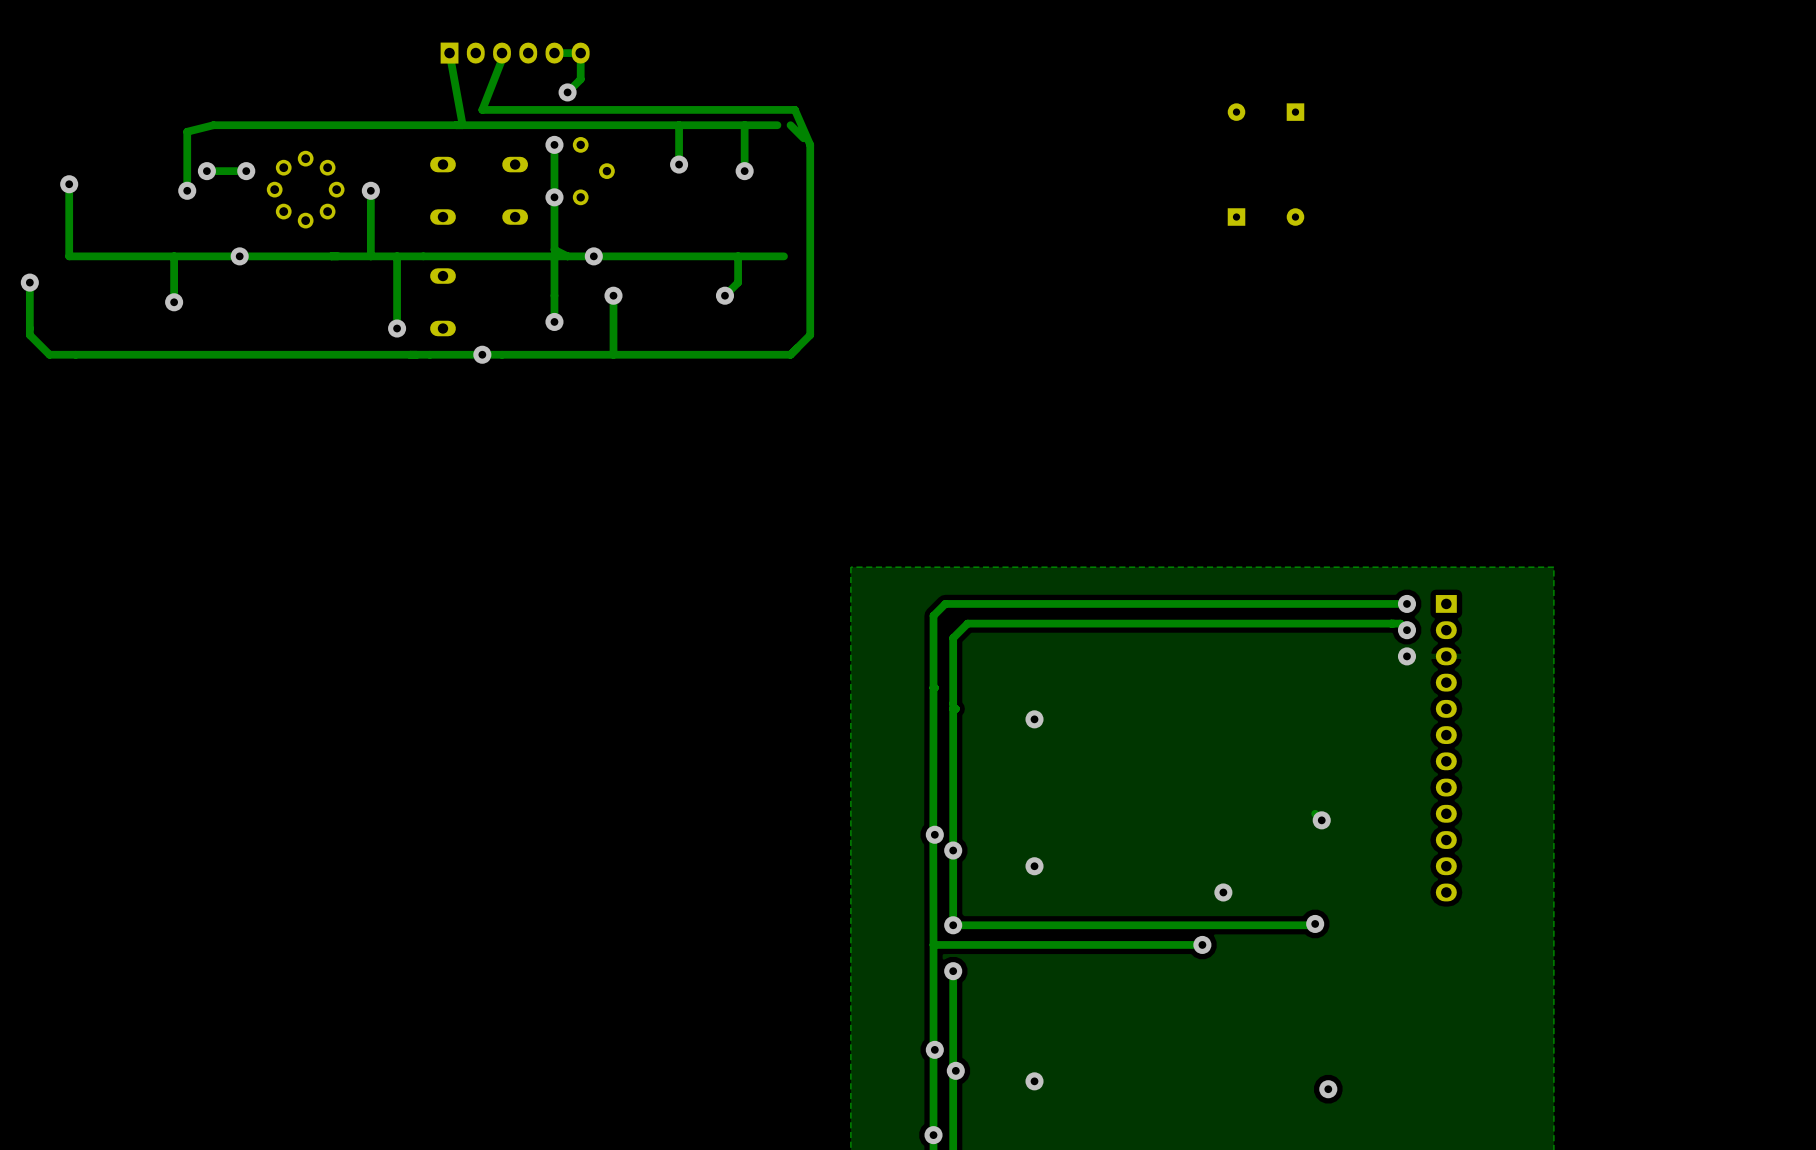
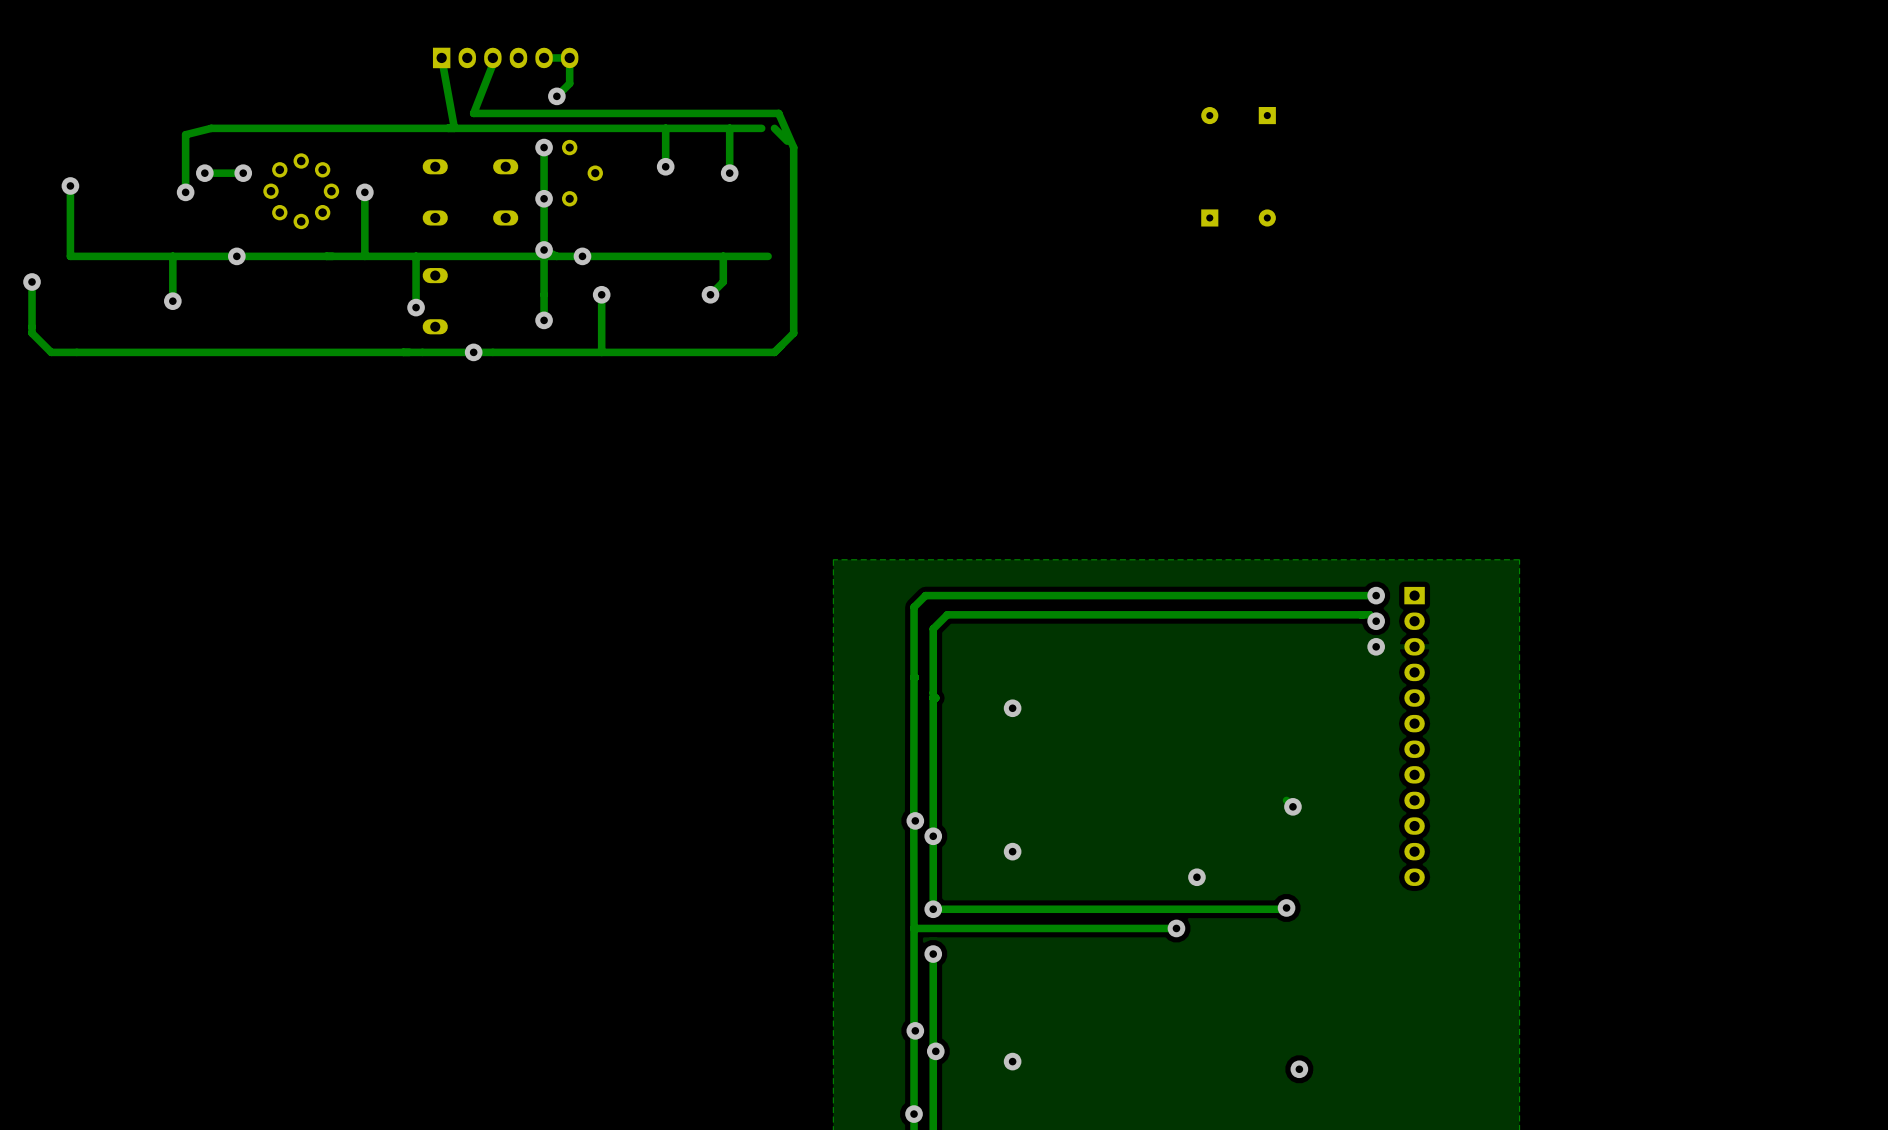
via: none -> (544, 249)
track: (397, 256) (397, 328) -> none
track: none -> (416, 256) (416, 307)
via position: (397, 328) -> (416, 307)

